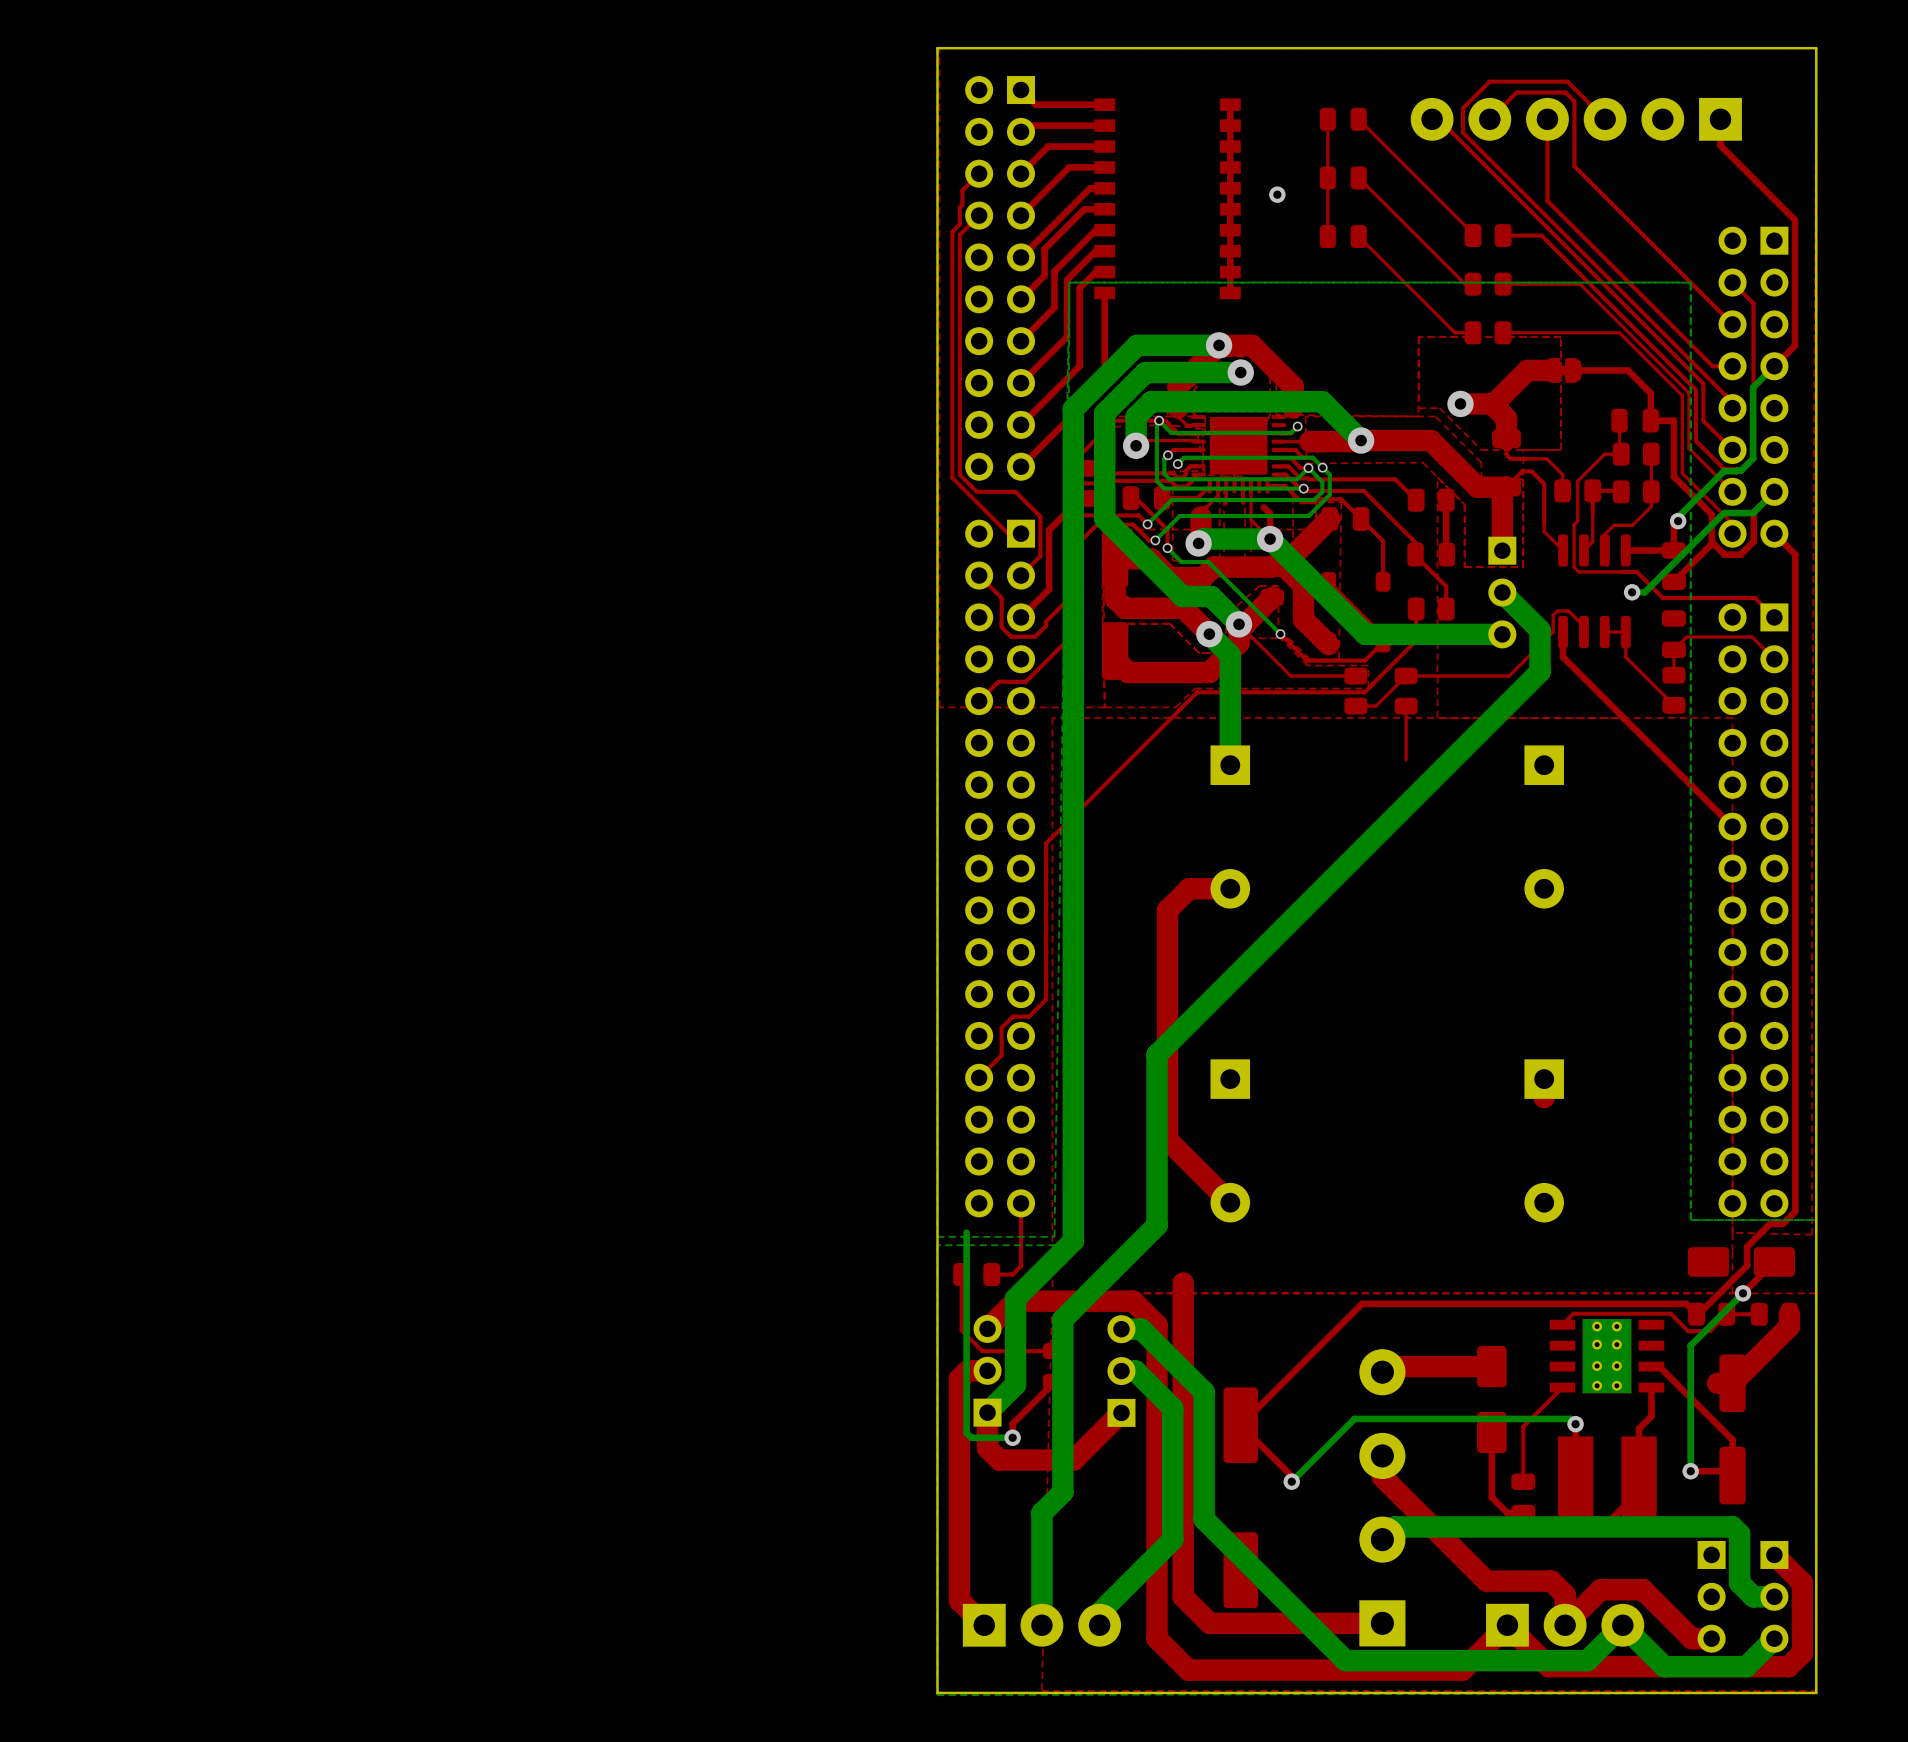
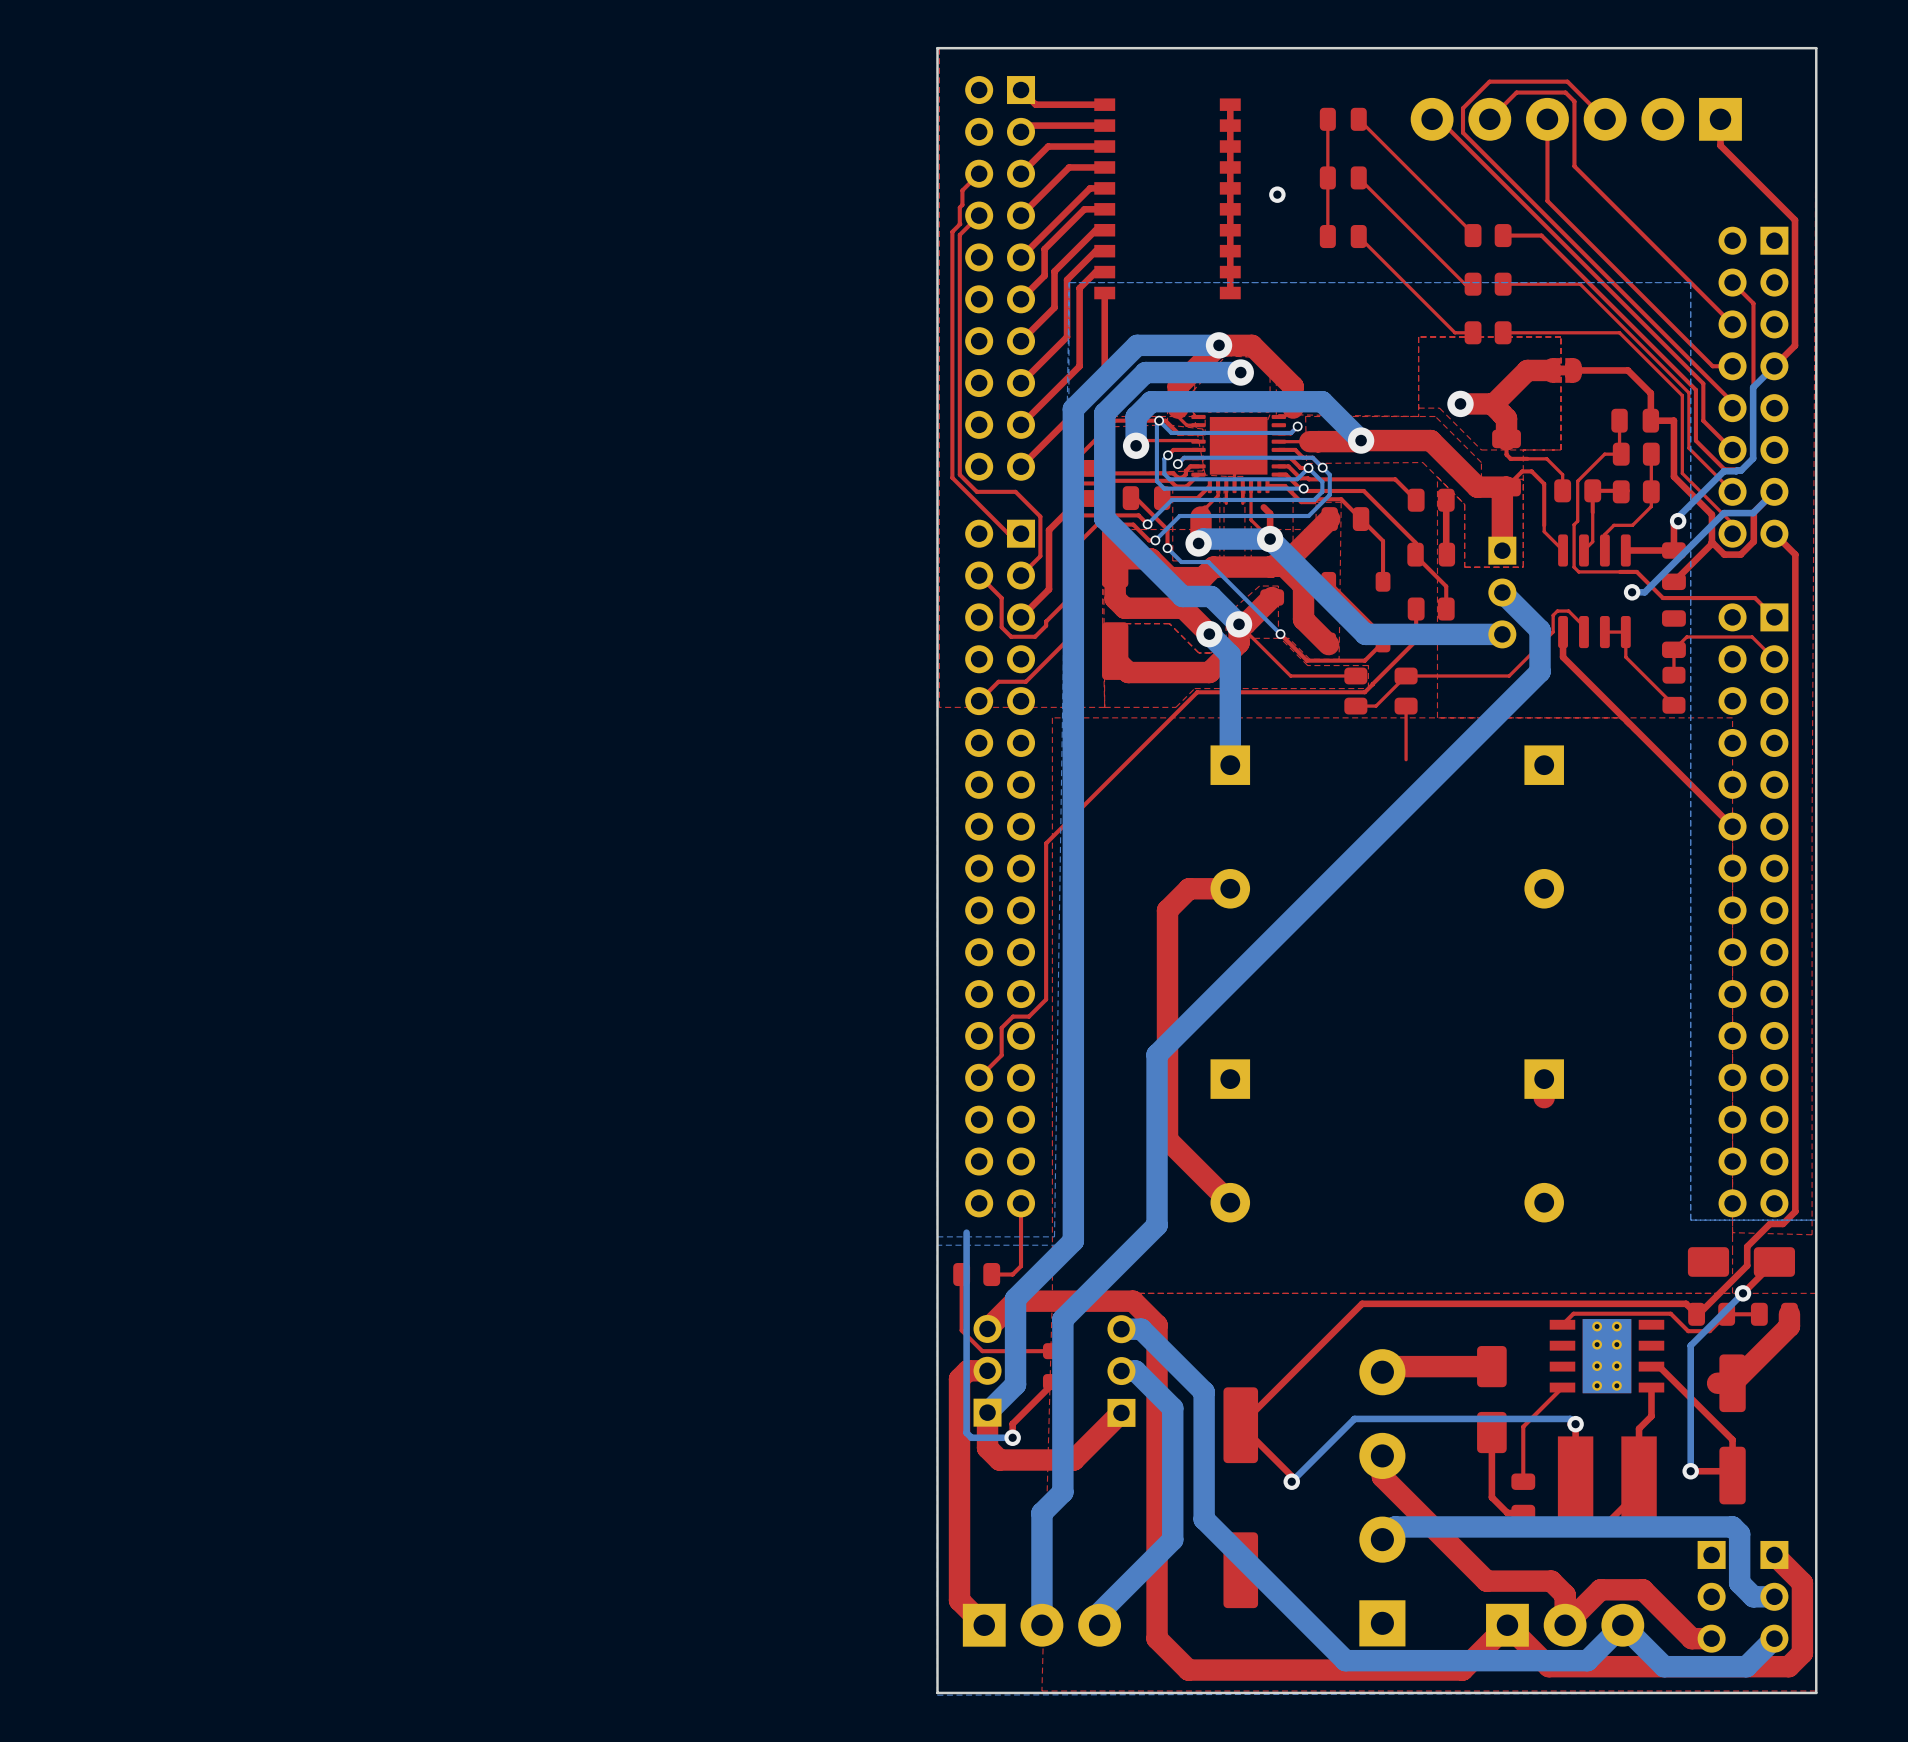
top track: (1183, 1282) (1183, 1596) (1209, 1623) (1382, 1623) -> none

